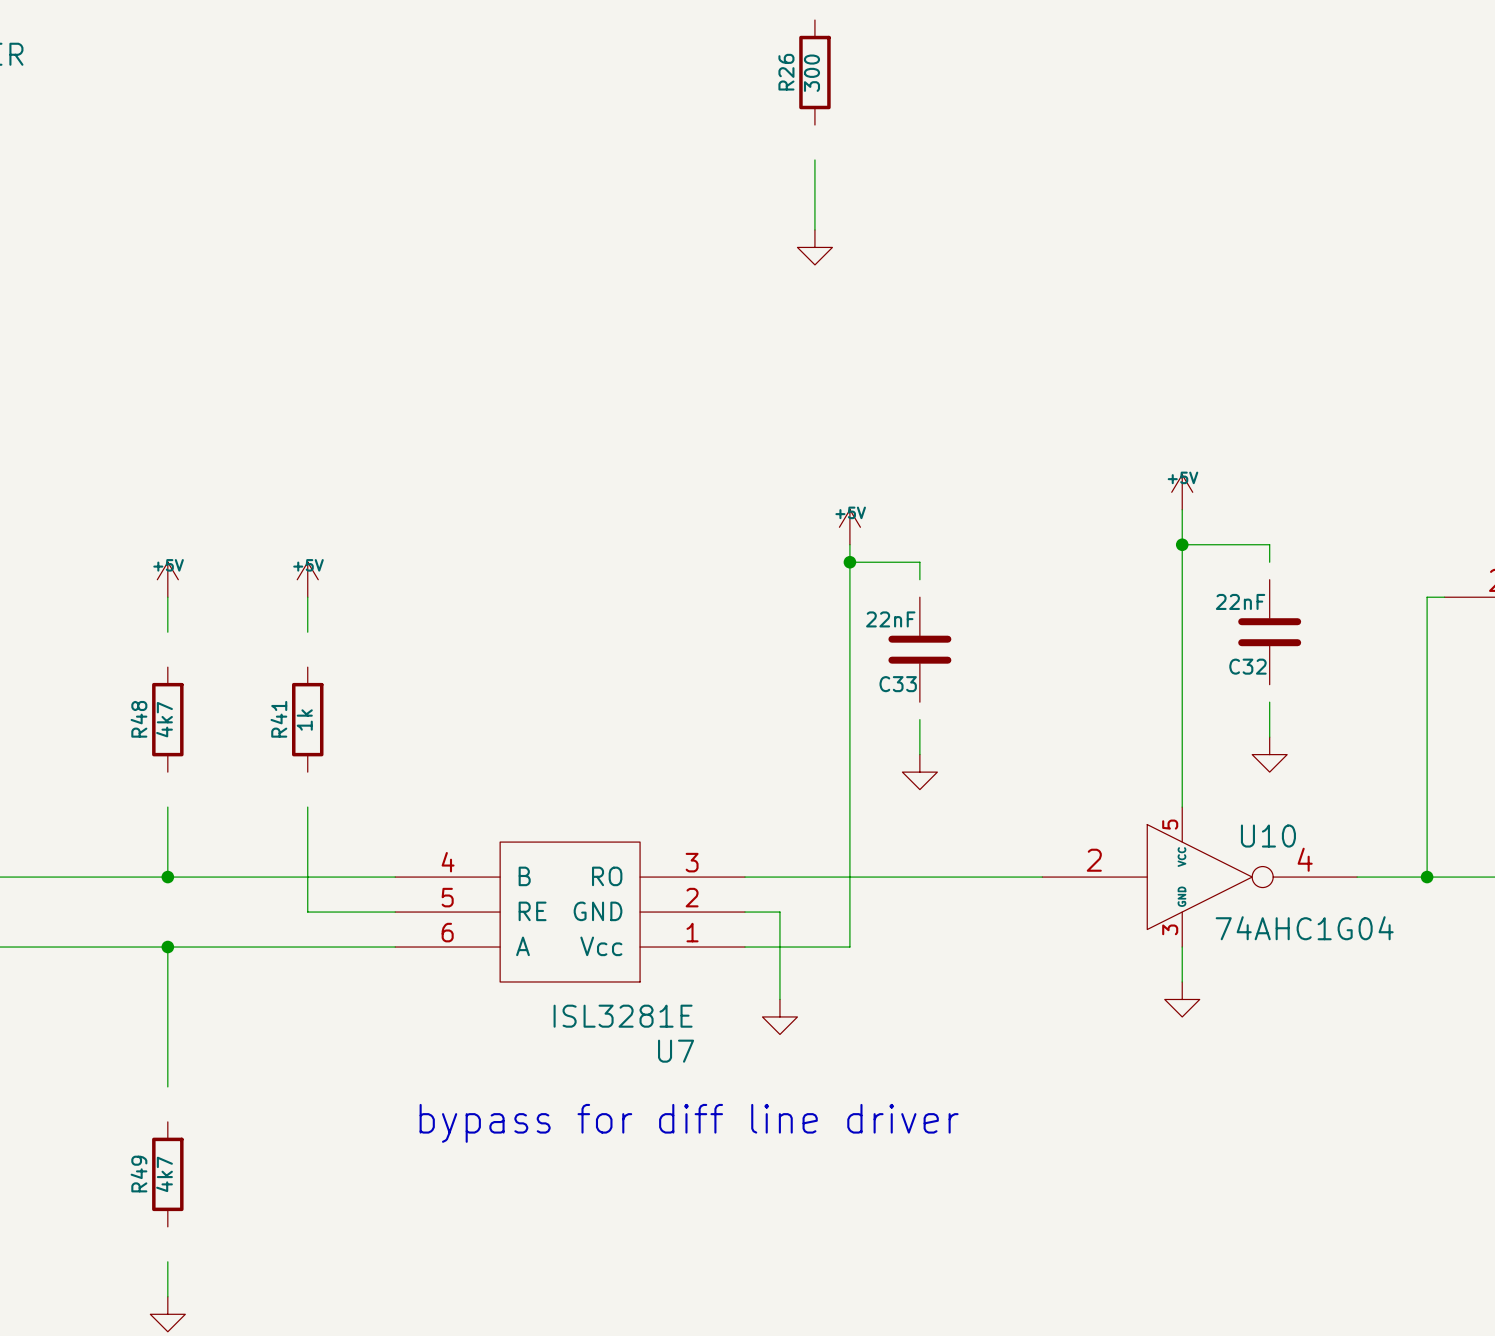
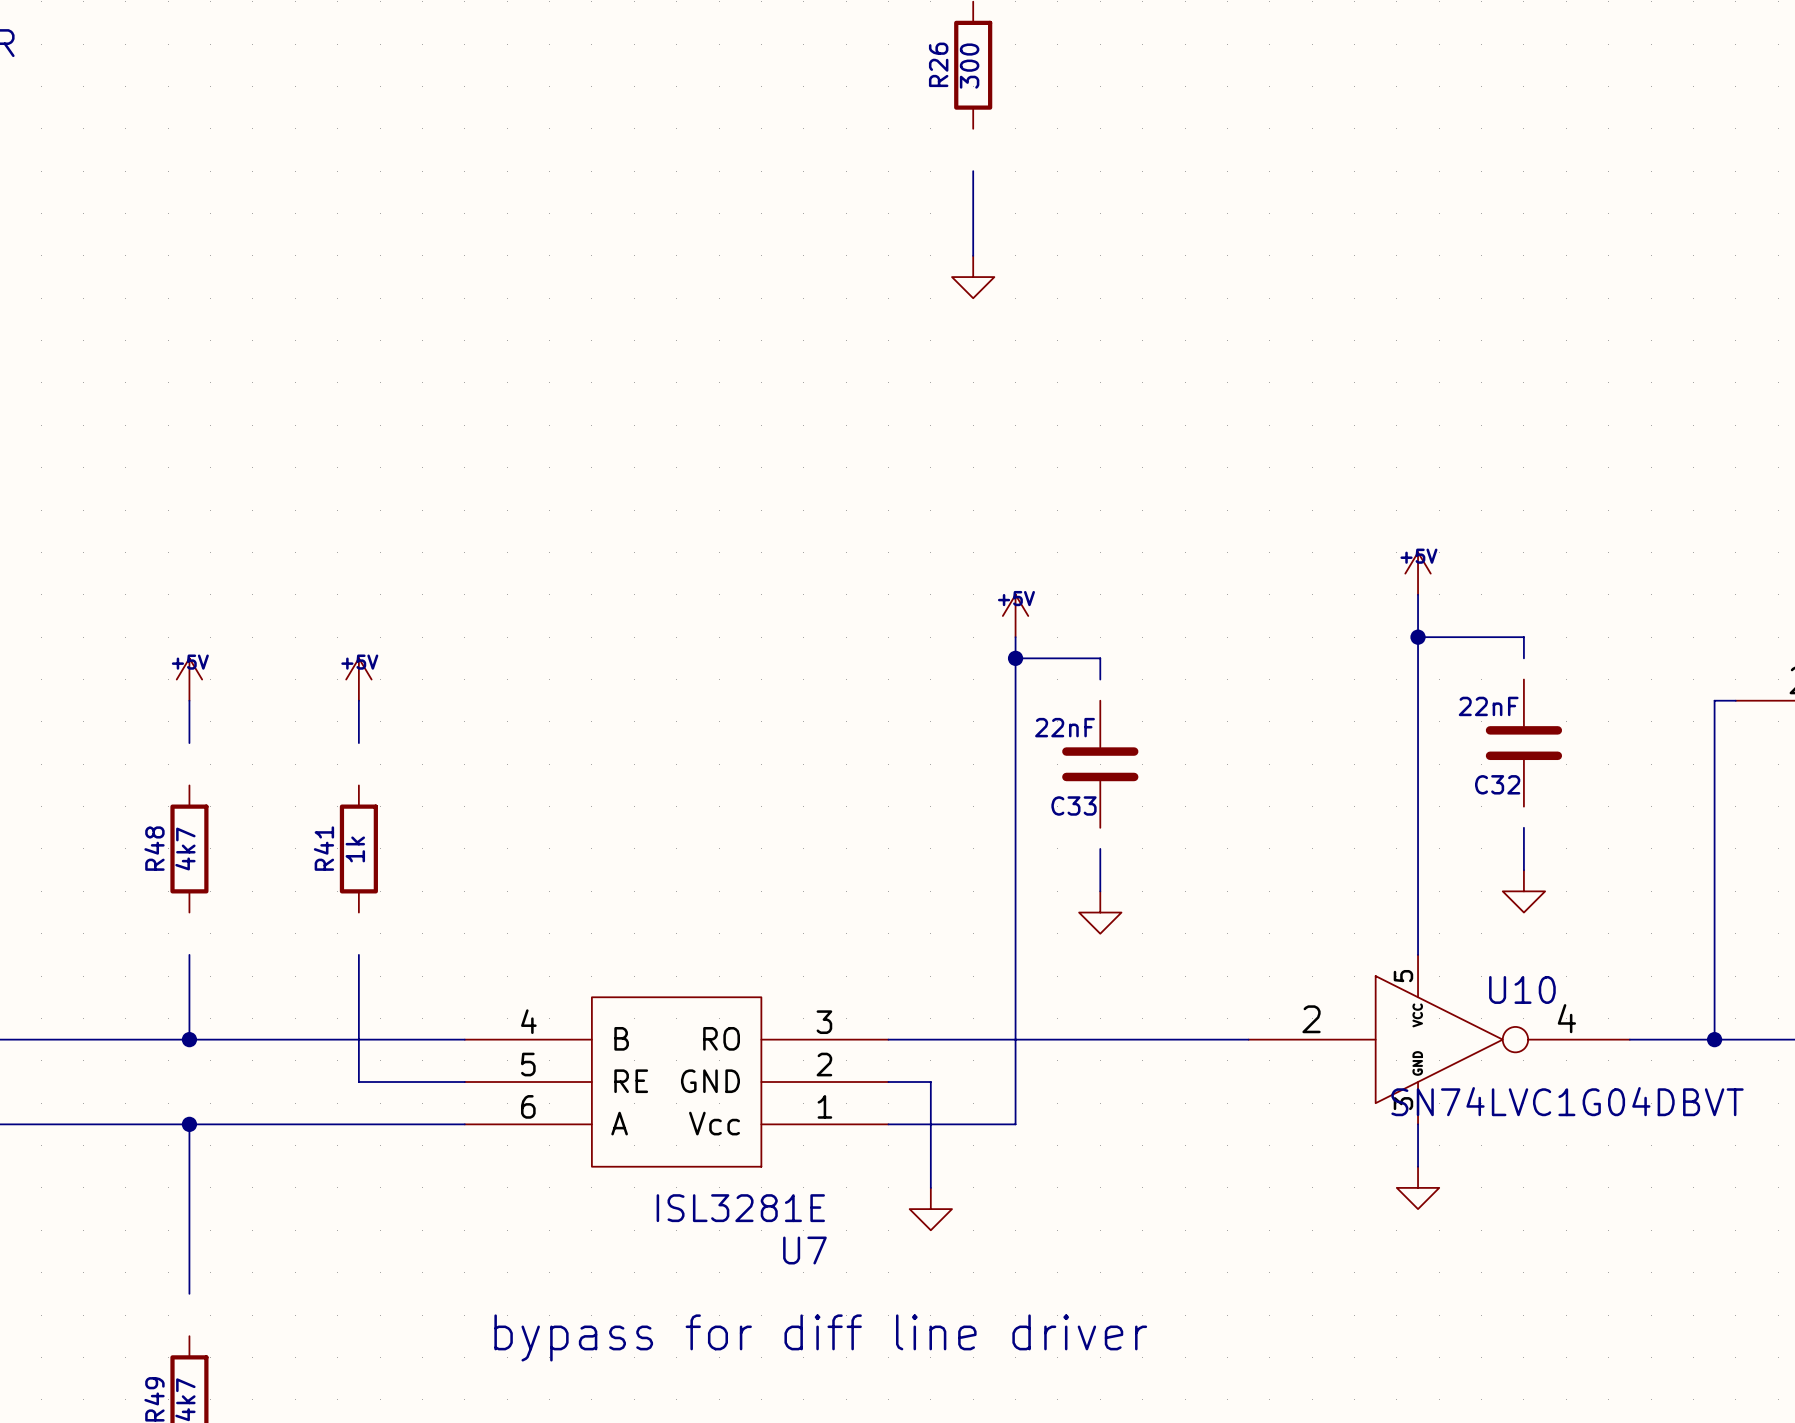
U10 value: 74AHC1G04 (1304, 928) -> SN74LVC1G04DBVT (1567, 1101)

